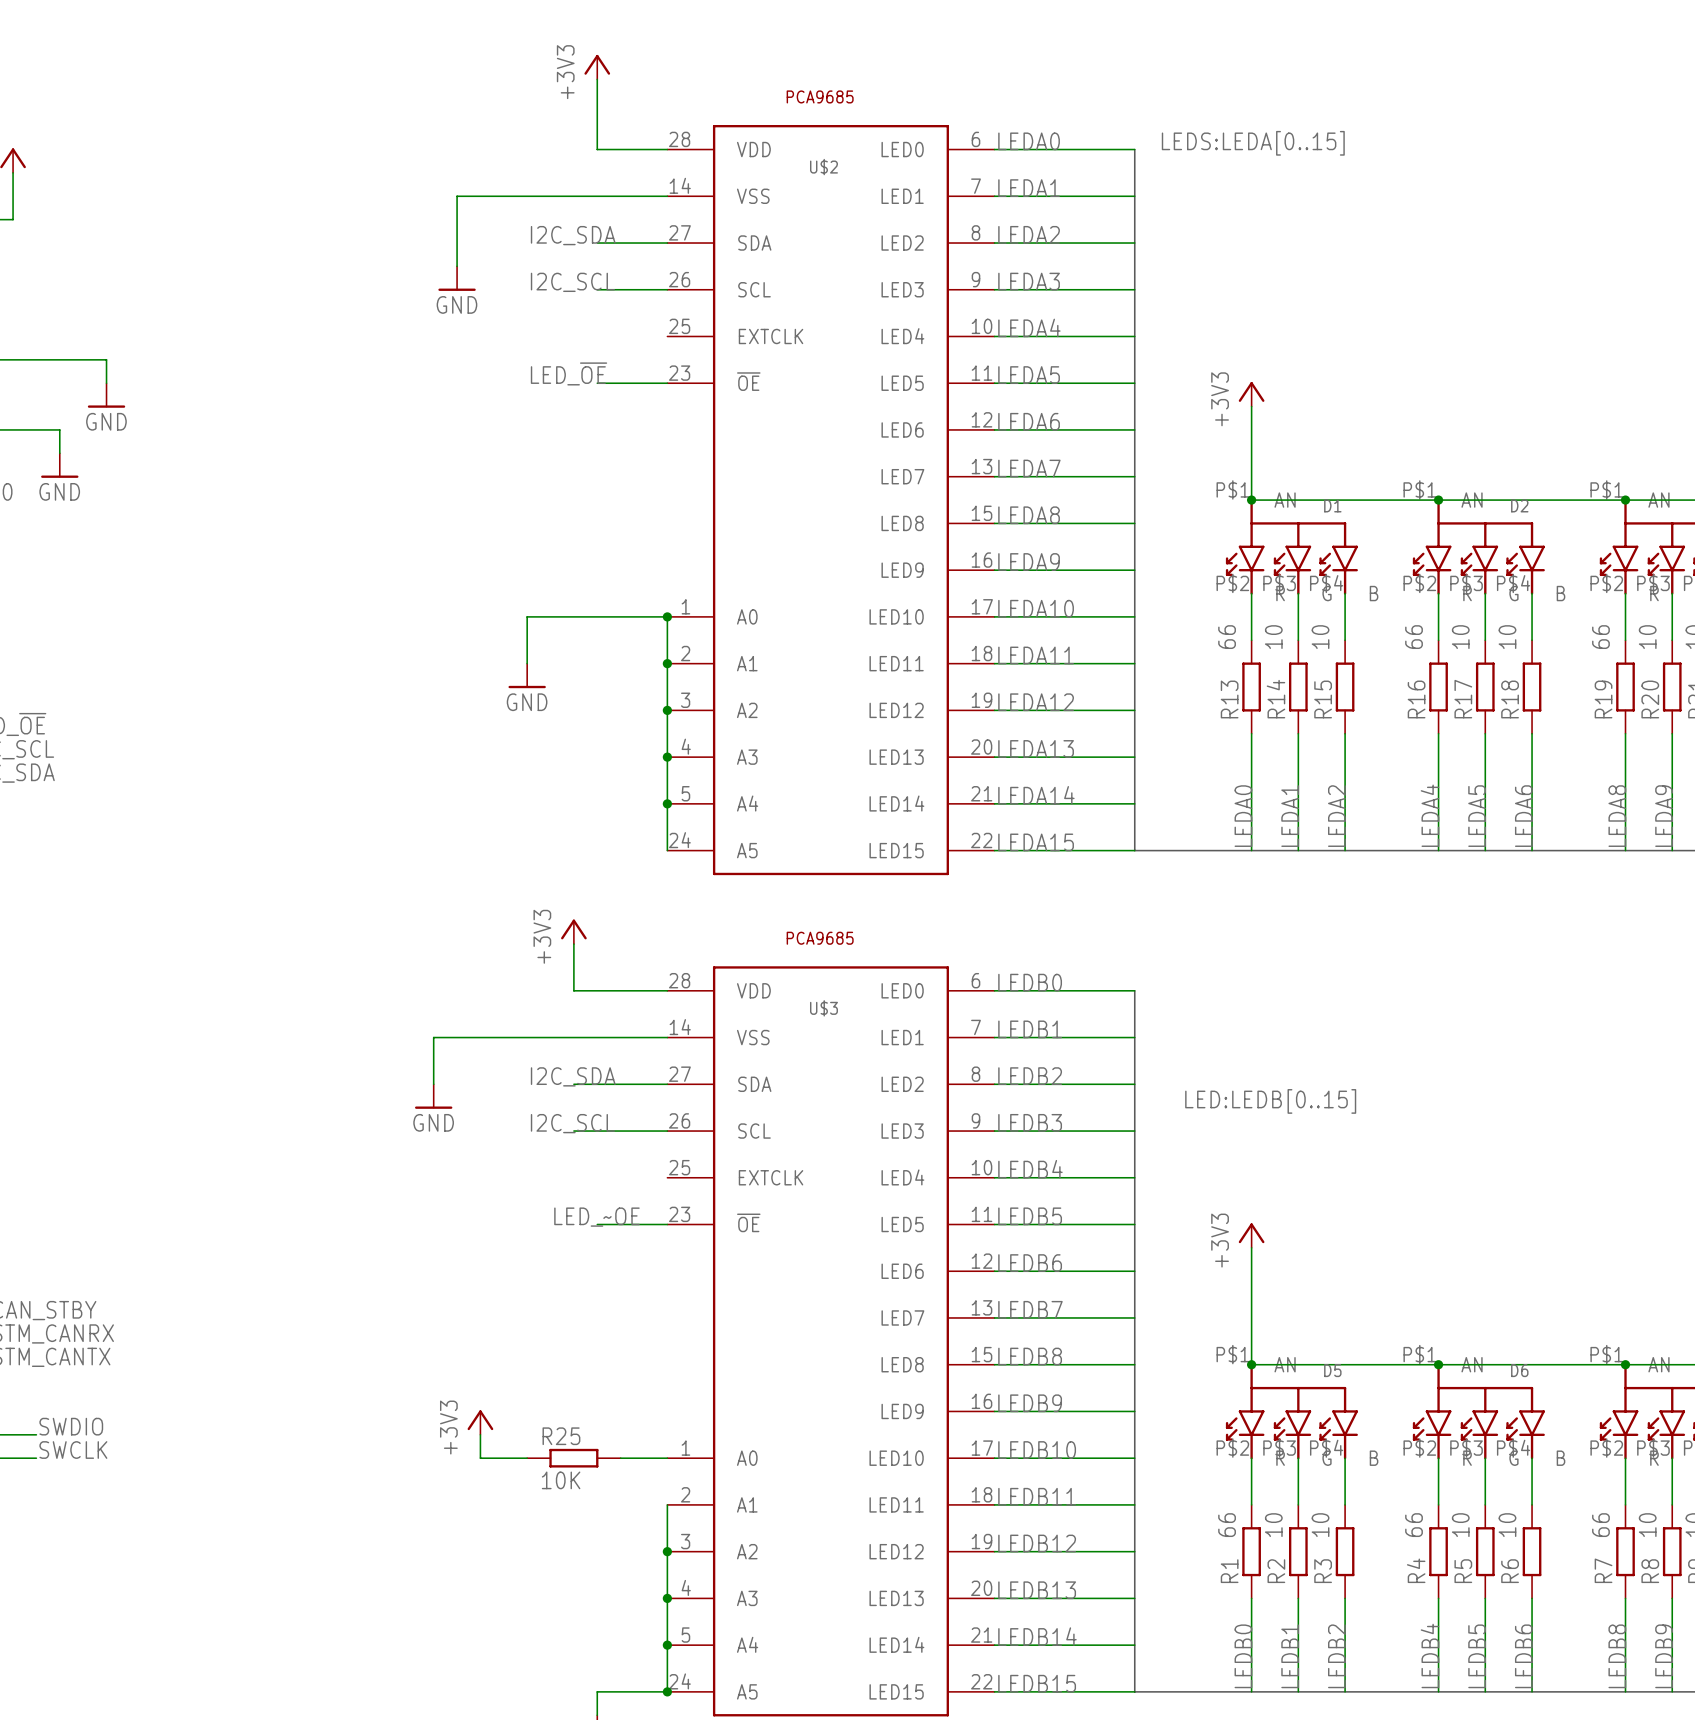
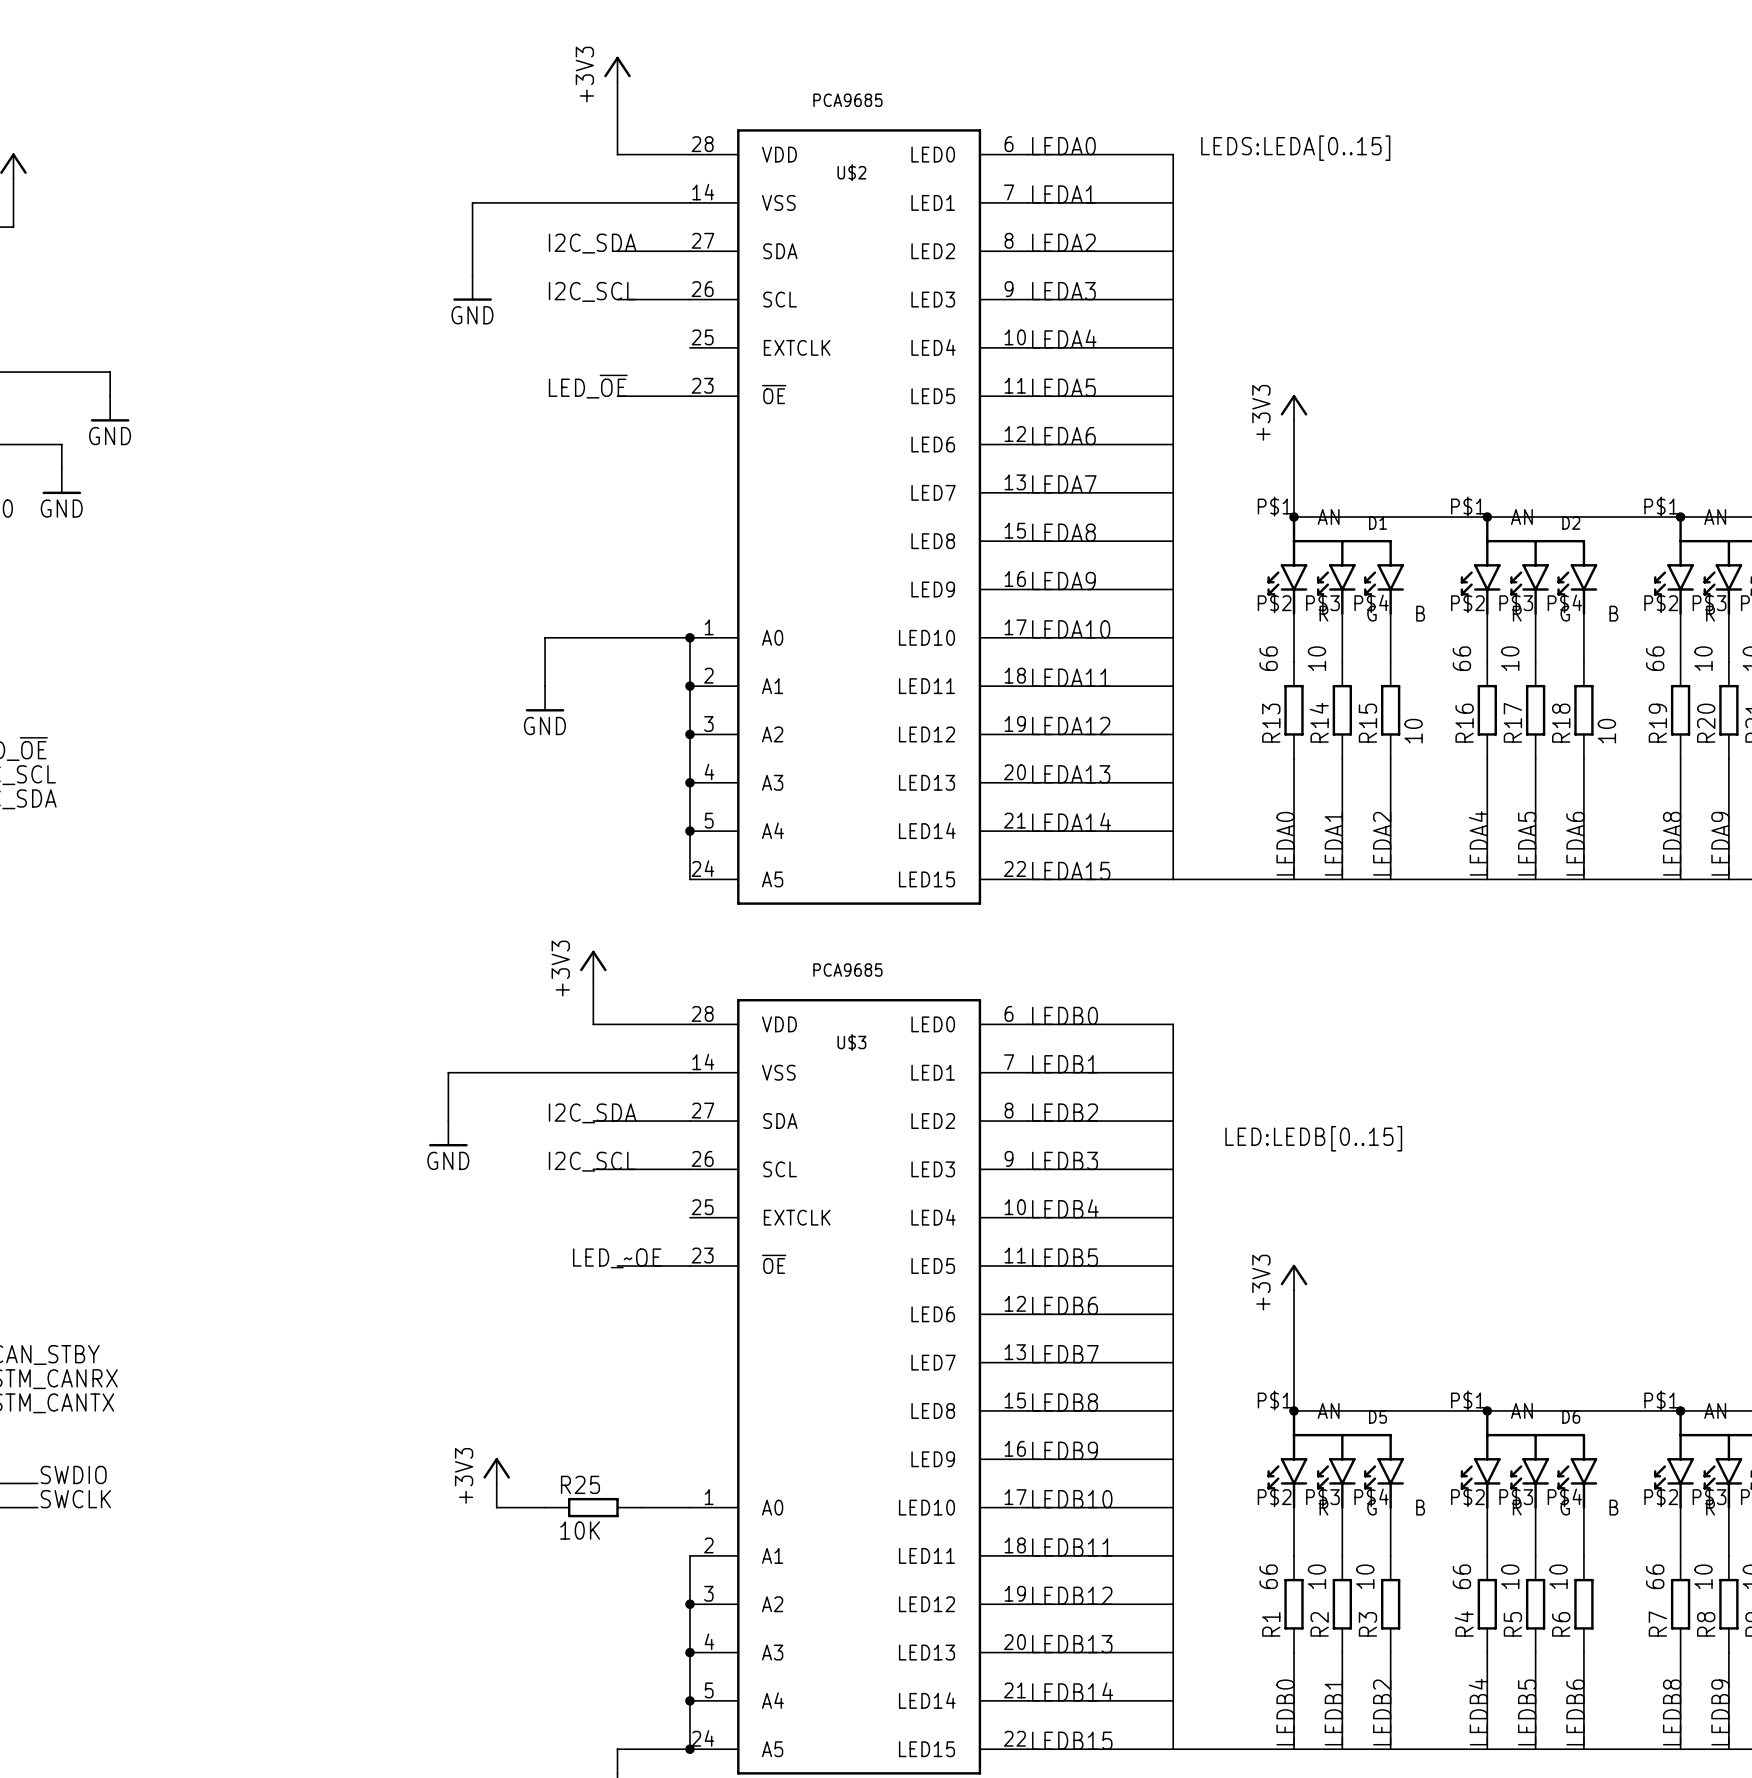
R15 value position: 10 (1320, 637) -> 10 (1413, 731)
R18 value position: 10 (1507, 637) -> 10 (1606, 731)

